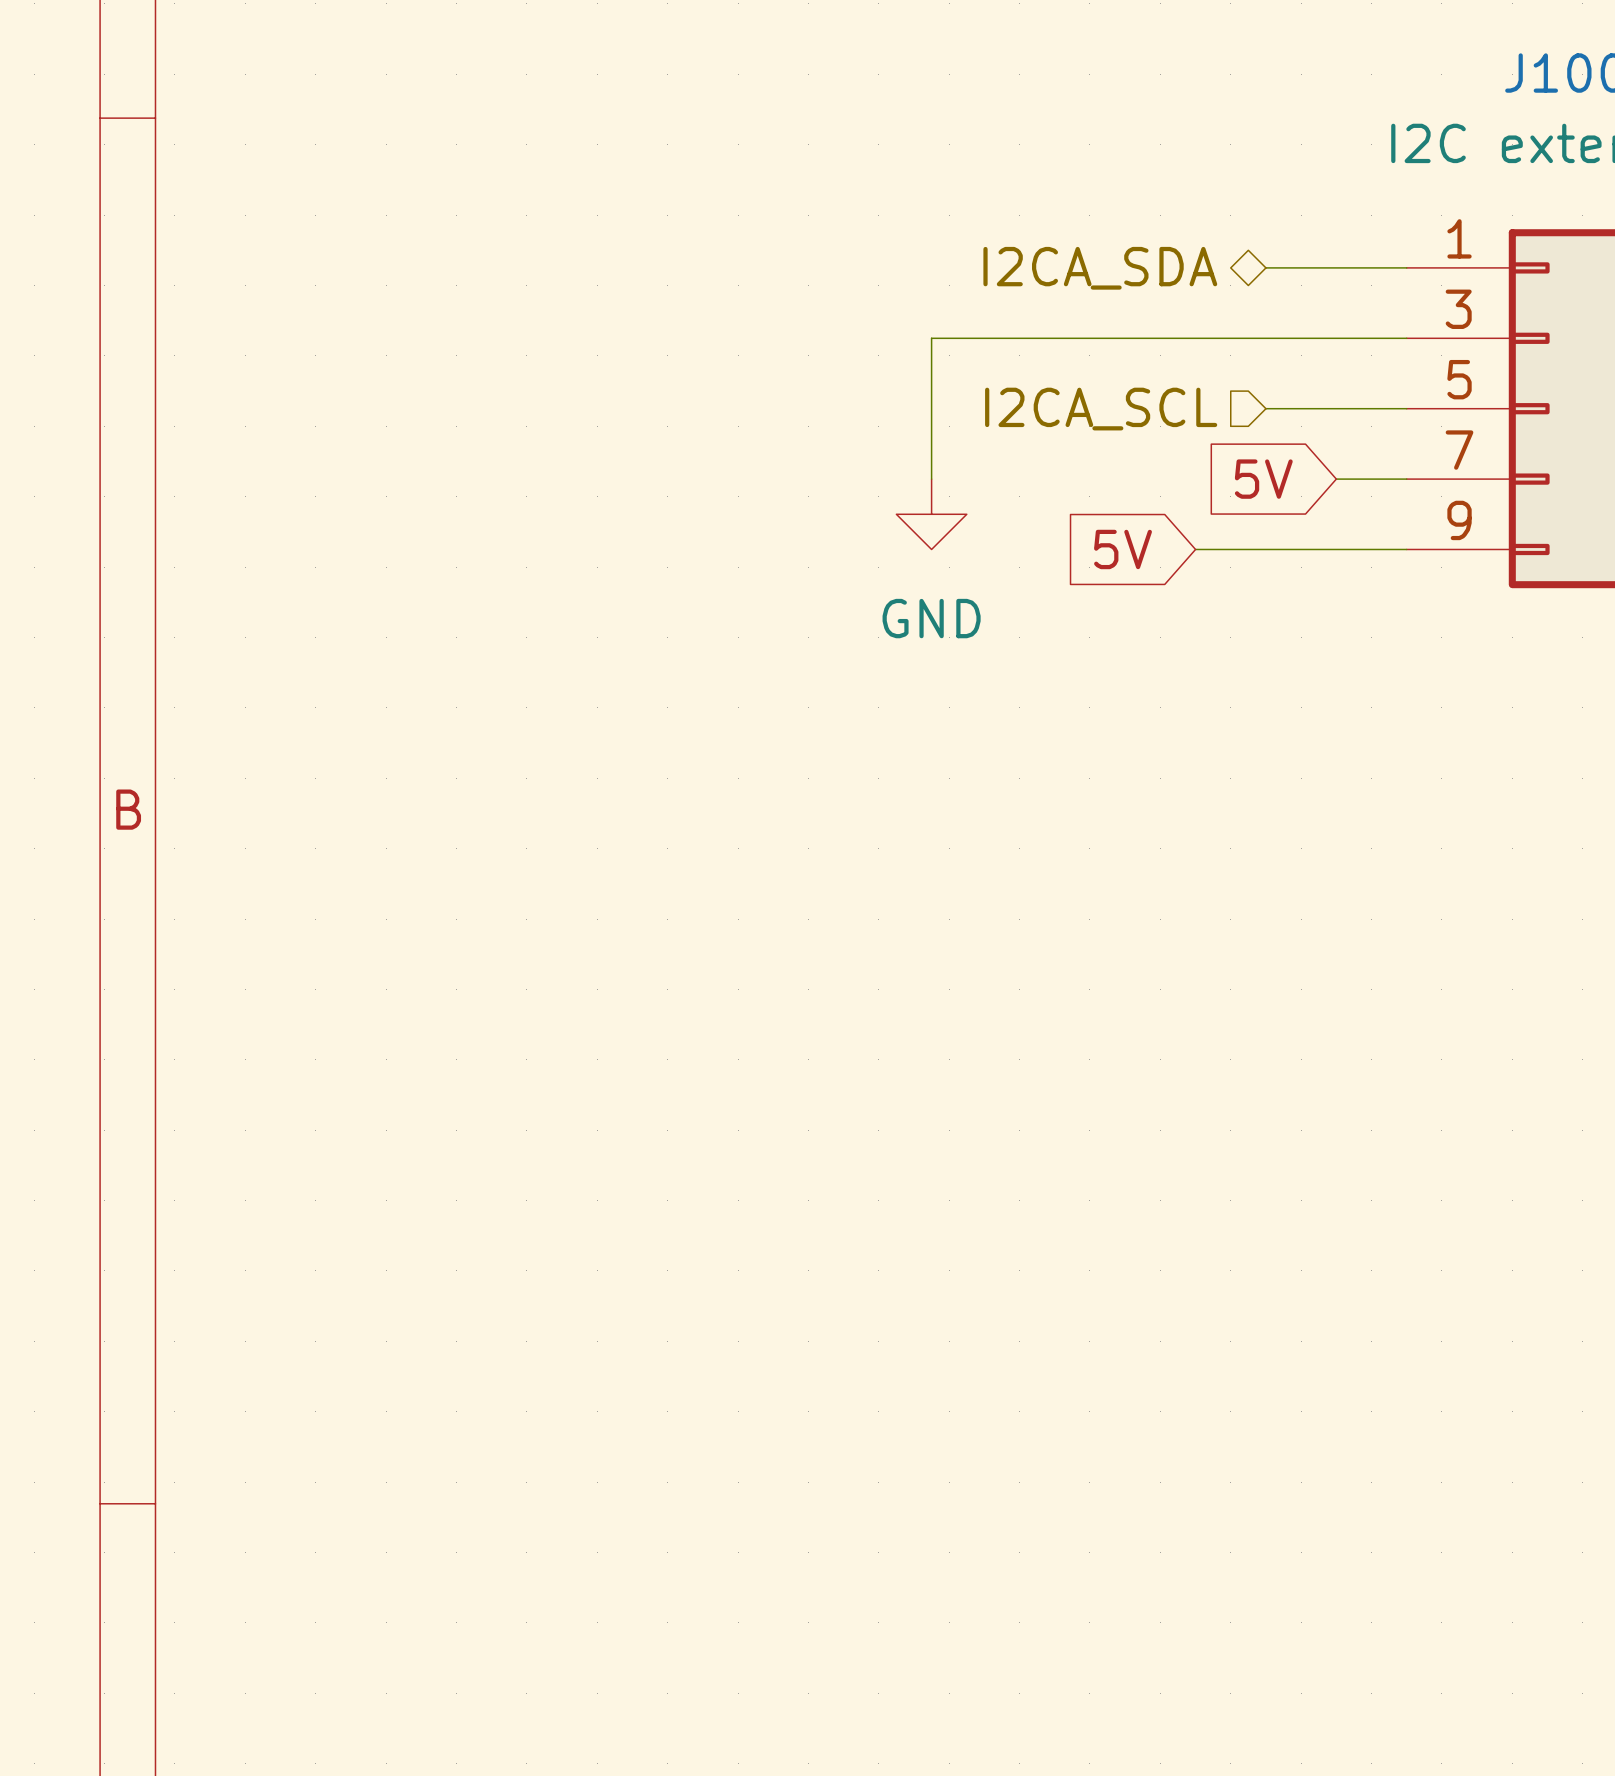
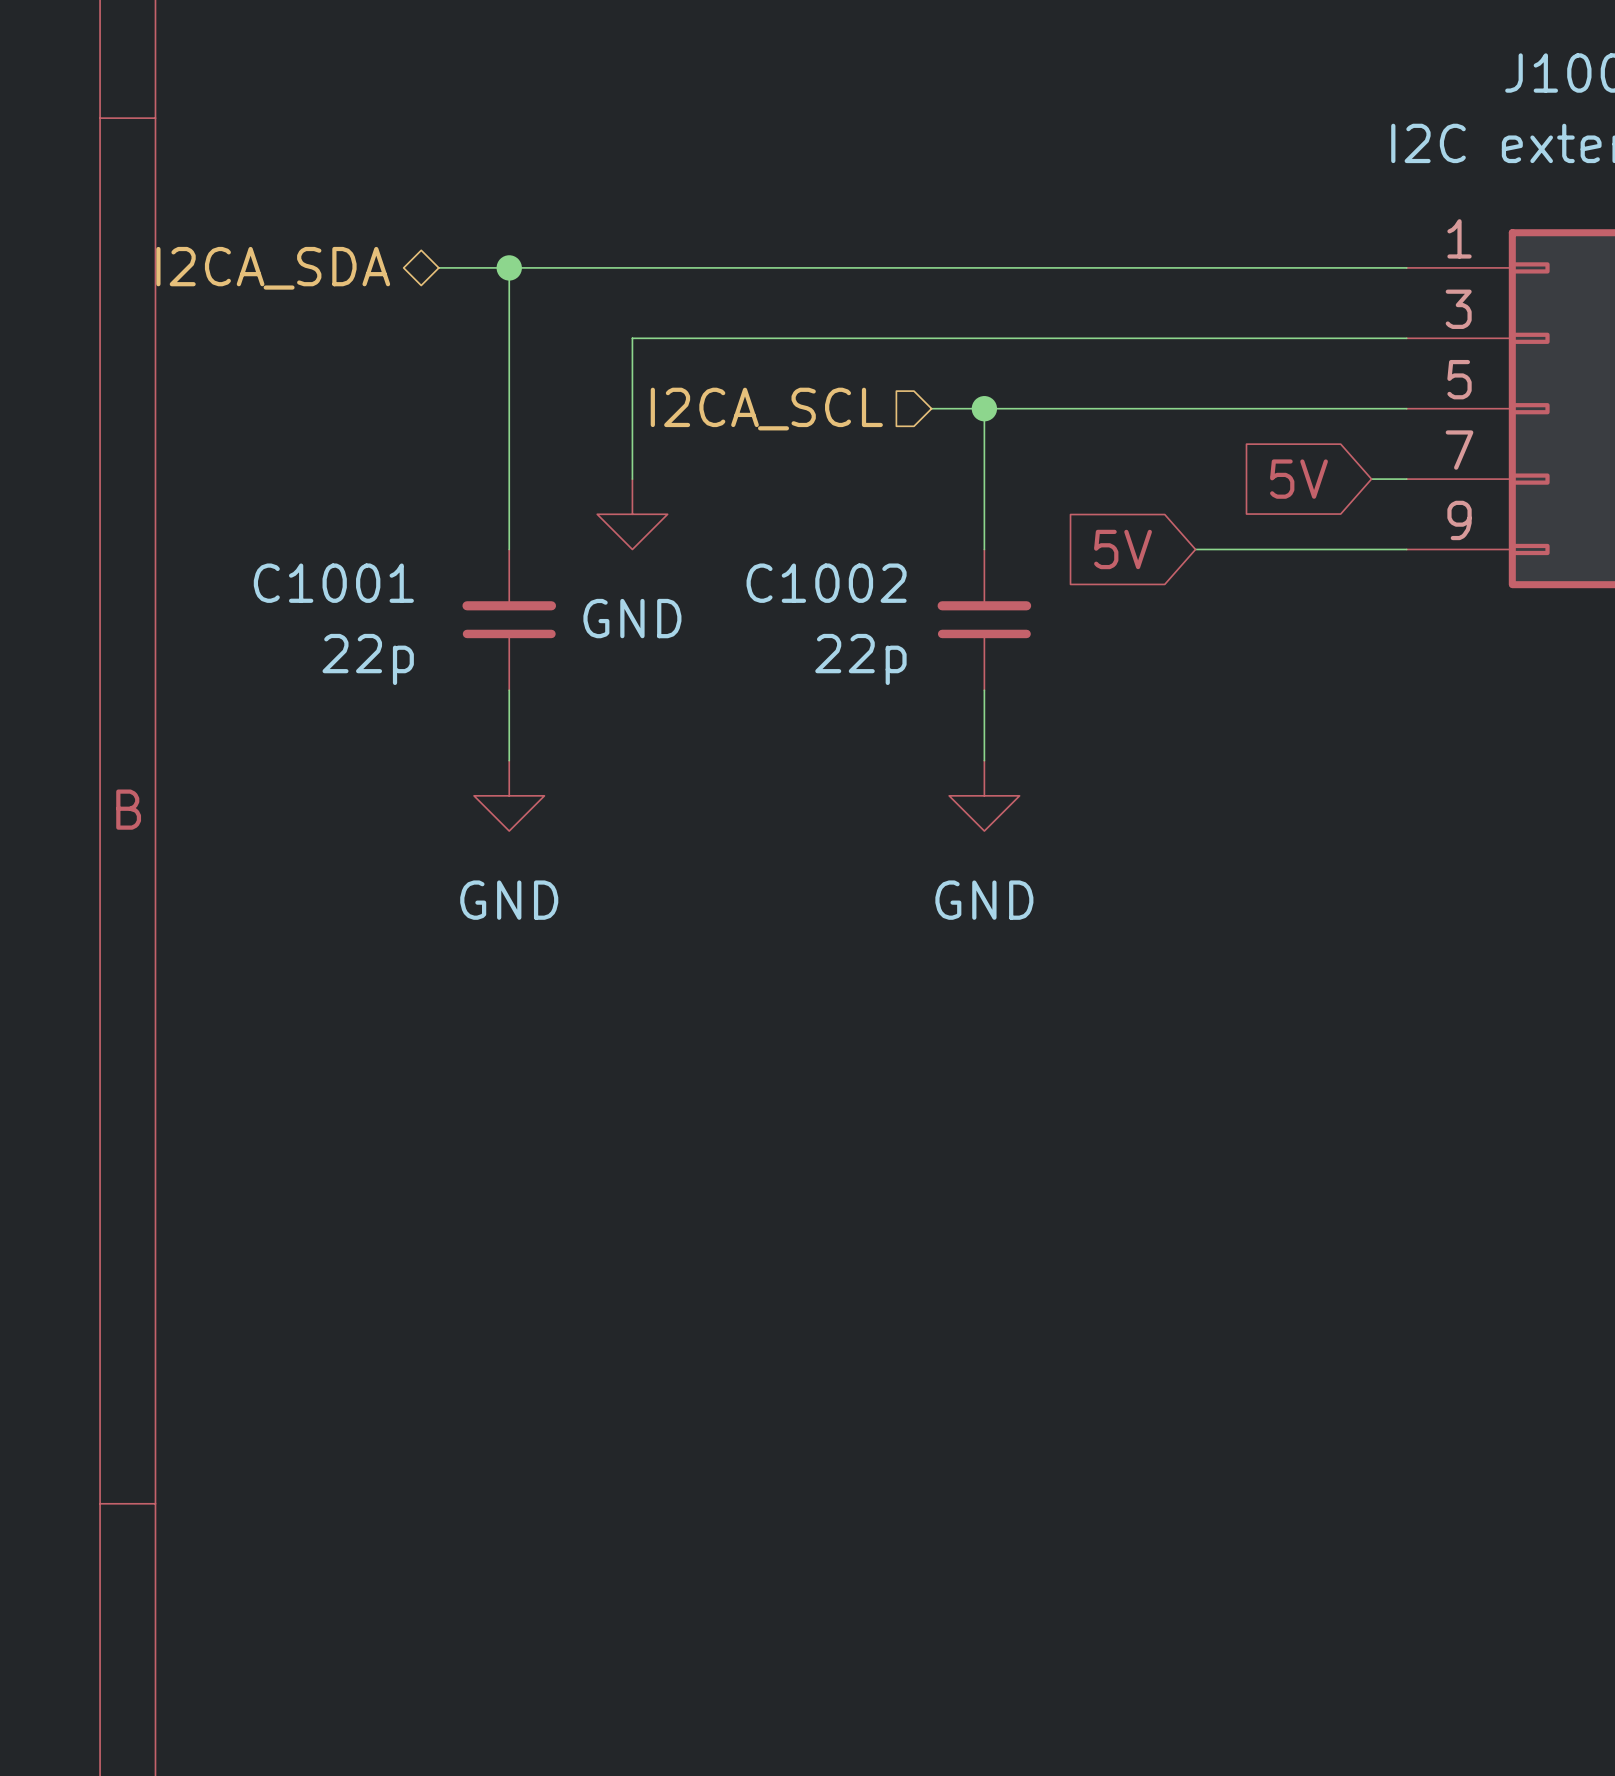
wire: none -> (438, 267) (1265, 267)
wire: none -> (509, 267) (509, 549)
junction: none -> (509, 267)
hierarchical label: none -> I2CA_SDA (273, 268)
hierarchical label: I2CA_SDA (1100, 268) -> none
wire: (931, 338) (931, 479) -> (931, 338) (632, 338) (632, 479)
wire: none -> (931, 408) (1265, 408)
wire: none -> (984, 408) (984, 549)
junction: none -> (984, 408)
hierarchical label position: I2CA_SCL (1101, 409) -> I2CA_SCL (766, 409)
global label position: 5V (1263, 479) -> 5V (1298, 479)
wire: (1336, 479) (1371, 479) -> none
power symbol: none -> GND (632, 514)
power symbol: GND (931, 514) -> none
C1001: none -> 22p (509, 619)
C1002: none -> 22p (984, 619)
wire: none -> (509, 690) (509, 760)
wire: none -> (984, 690) (984, 760)
power symbol: none -> GND (509, 795)
power symbol: none -> GND (984, 795)

